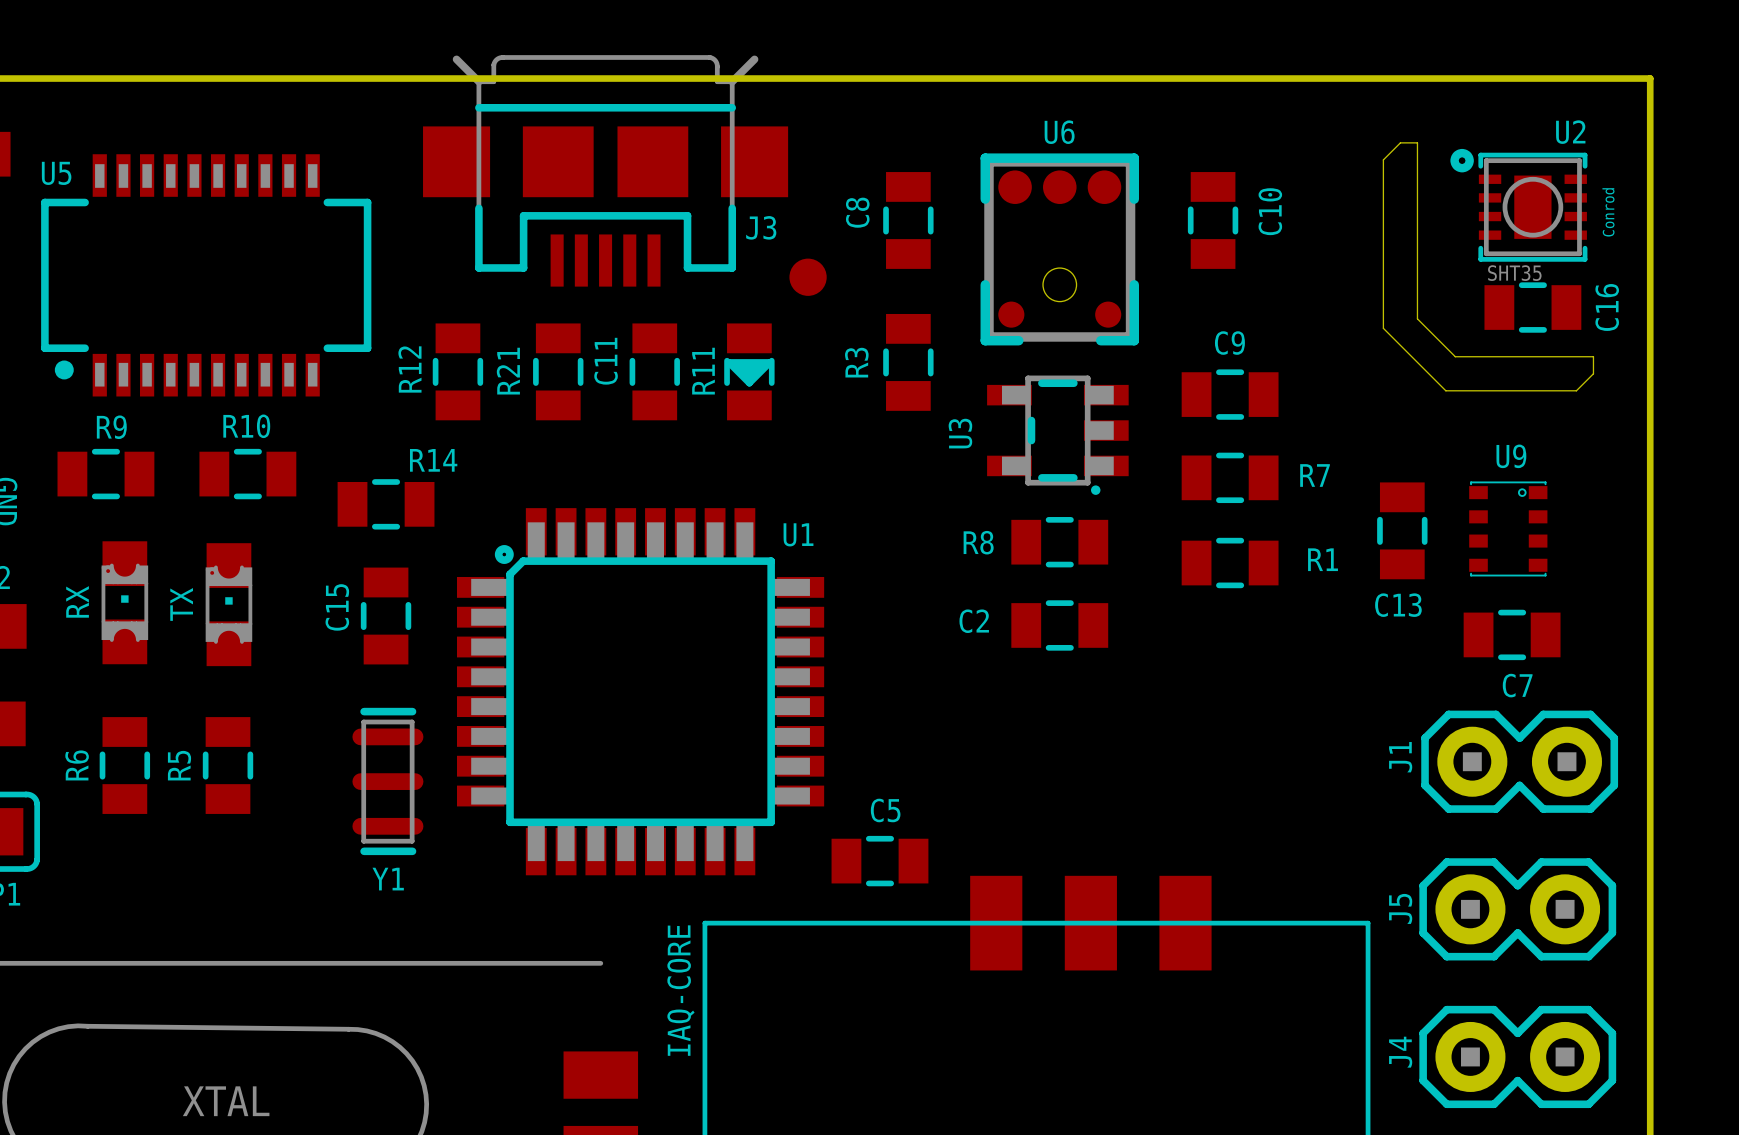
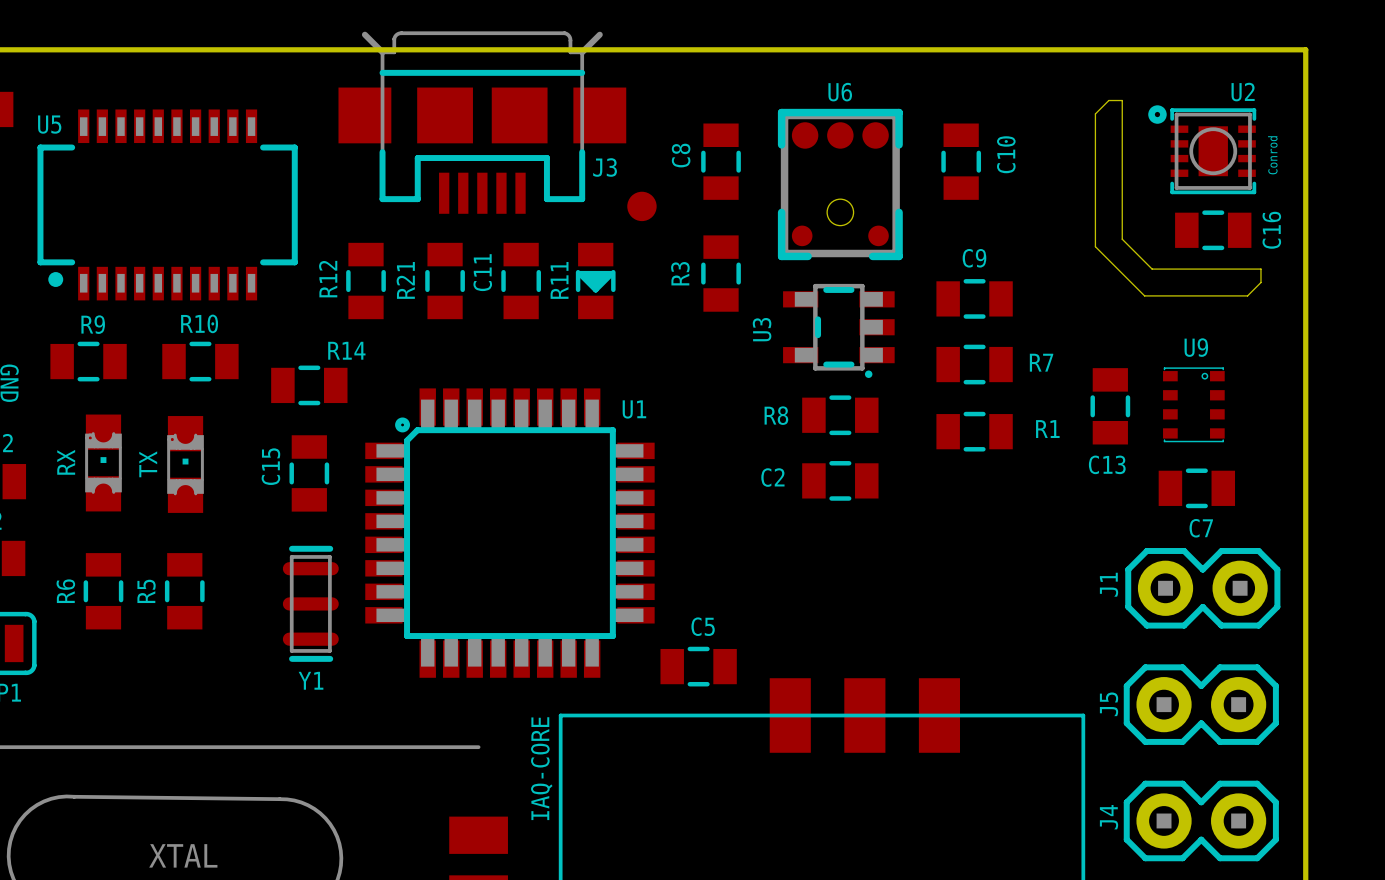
U2 value: SHT35 (1514, 273) -> none

